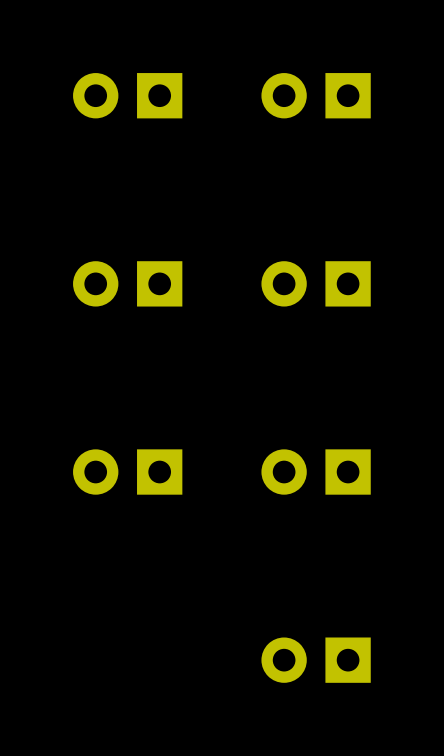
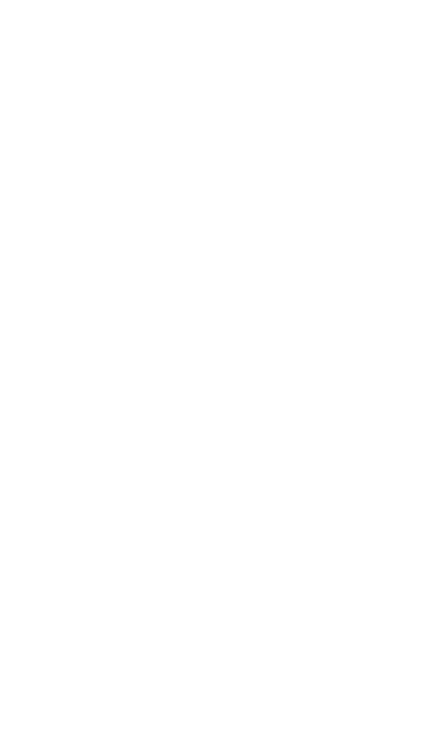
part: (127, 95) -> none
part: (316, 95) -> none
part: (127, 283) -> none
part: (316, 283) -> none
part: (127, 472) -> none
part: (316, 472) -> none
part: (316, 660) -> none

